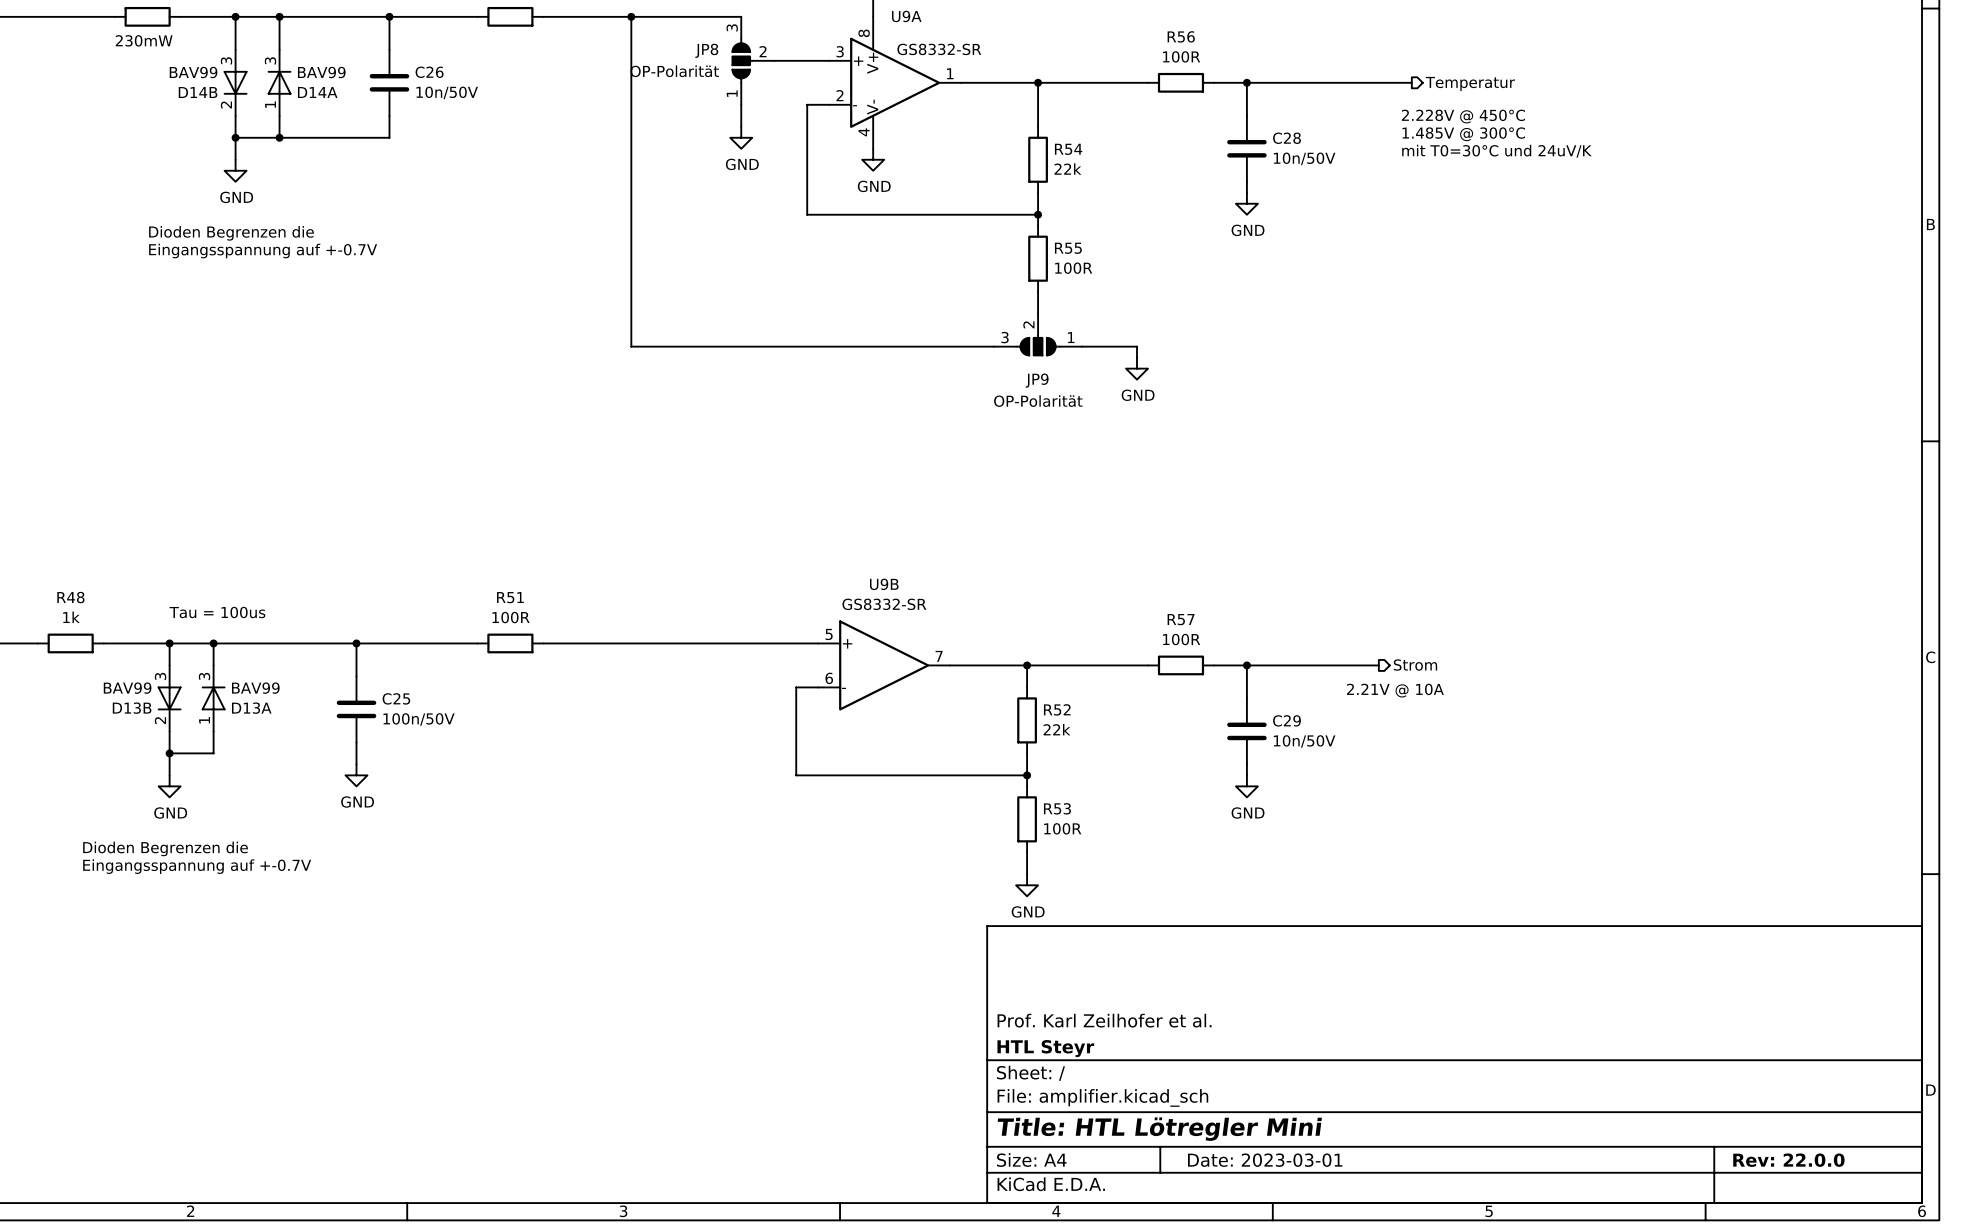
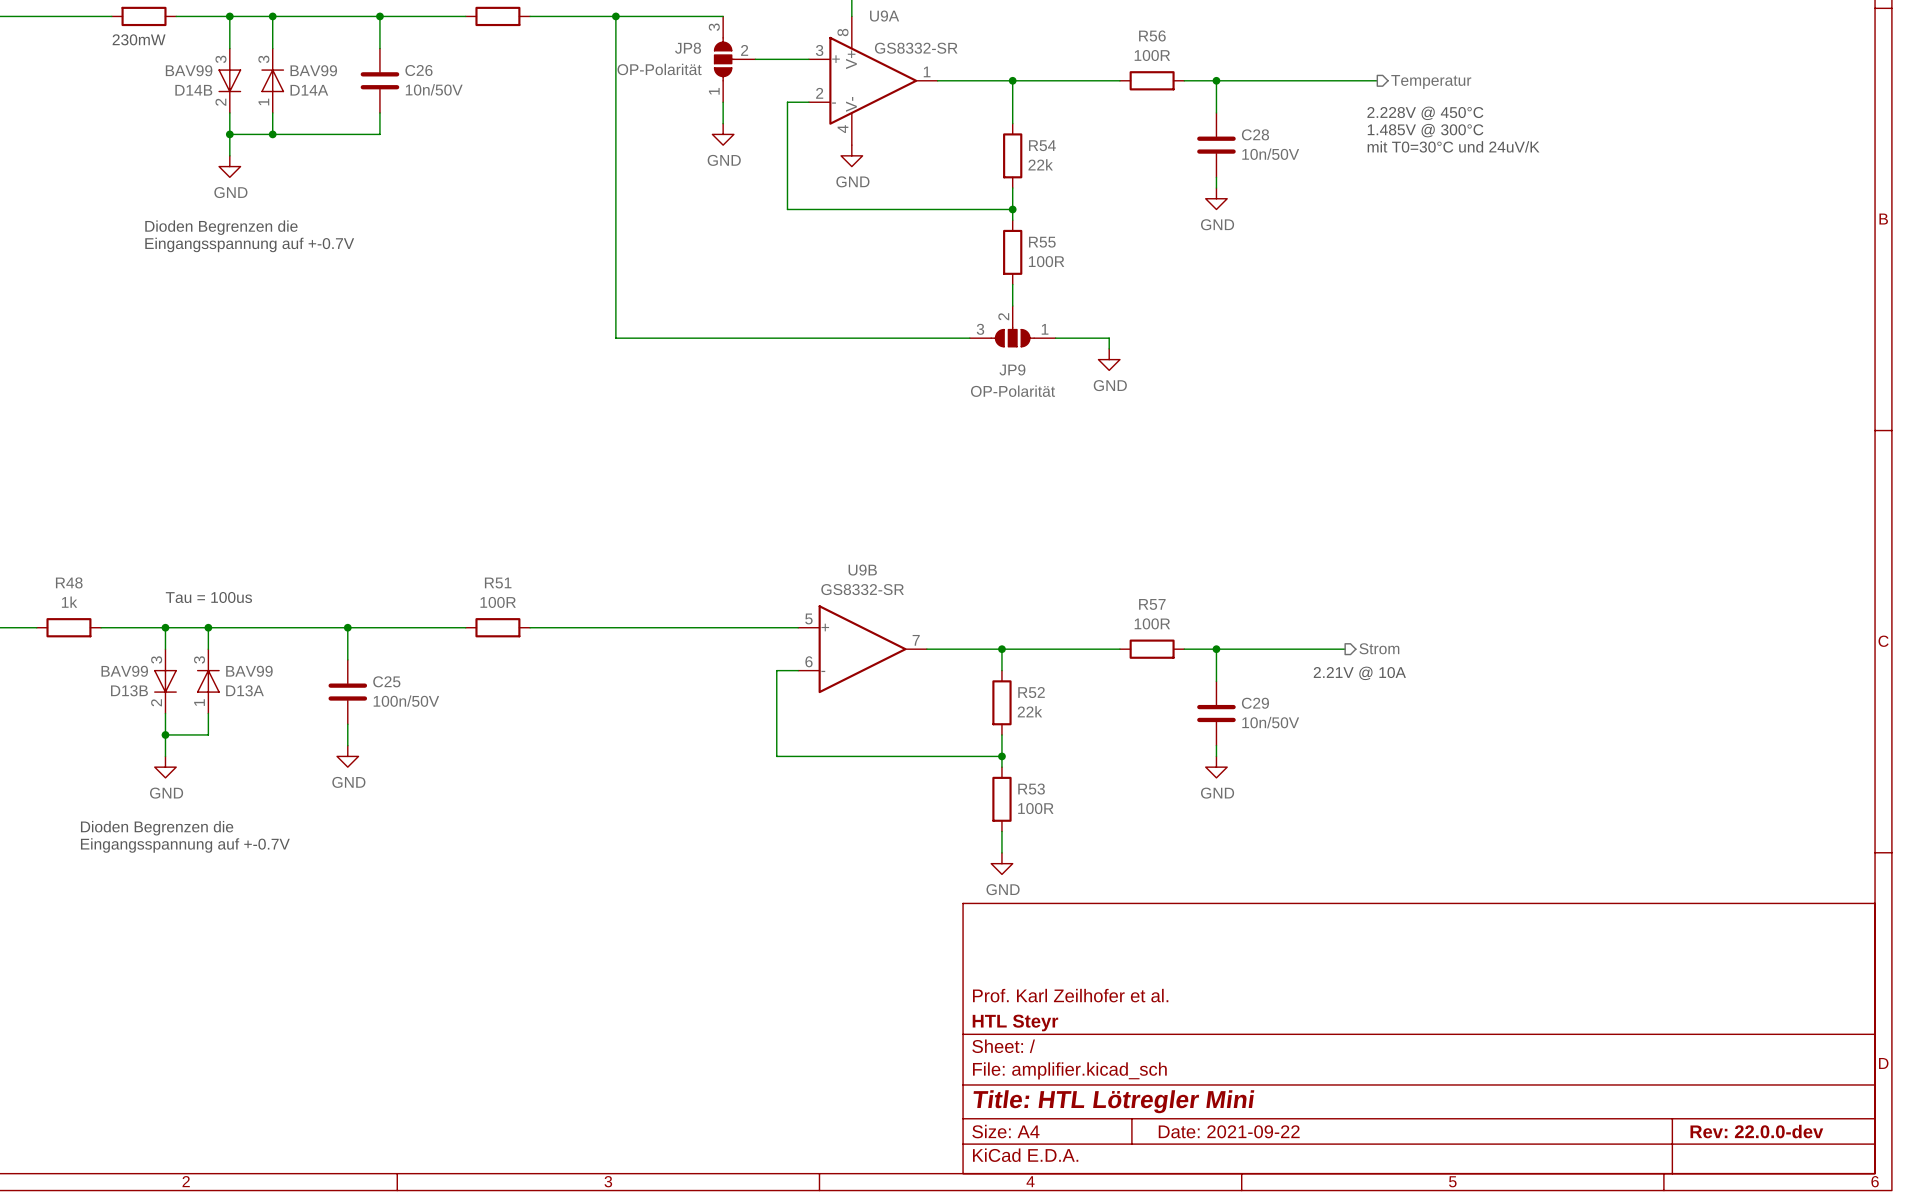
title block: Date: 2023-03-01 (1265, 1160) -> Date: 2021-09-22 (1229, 1131)
title block: Rev: 22.0.0 (1788, 1160) -> Rev: 22.0.0-dev (1756, 1131)

